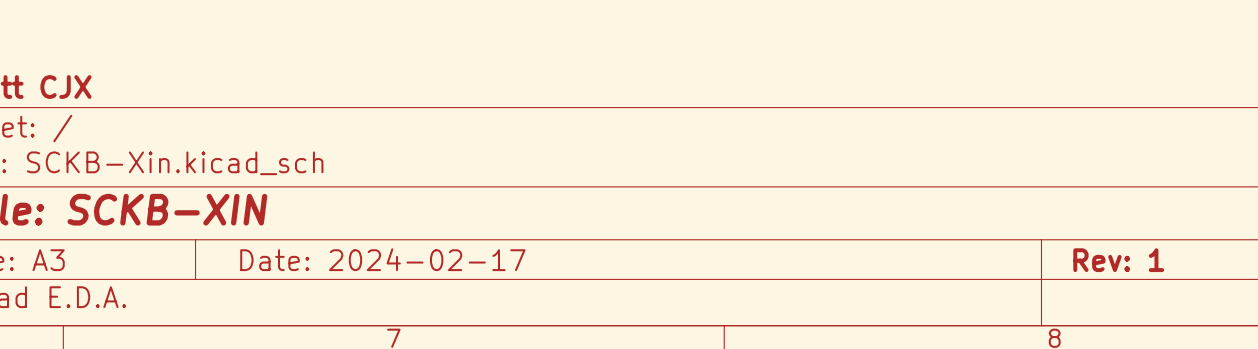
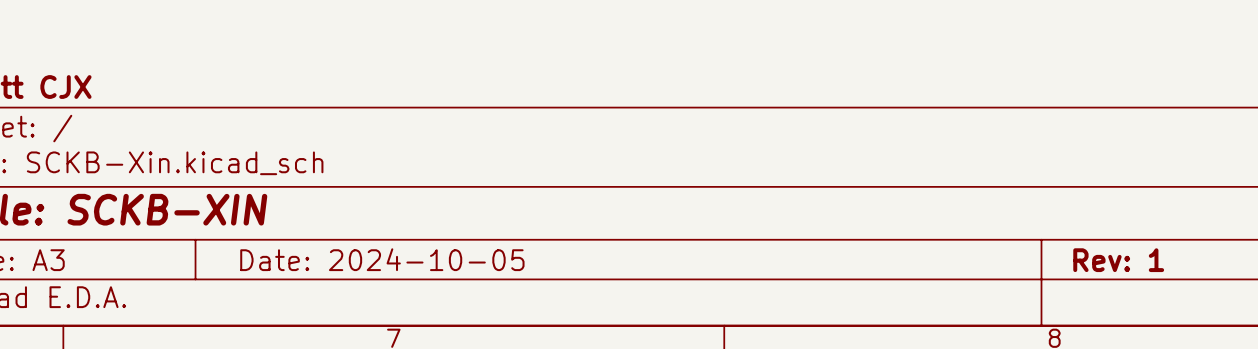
title block: Date: 2024-02-17 (382, 259) -> Date: 2024-10-05 (382, 259)

